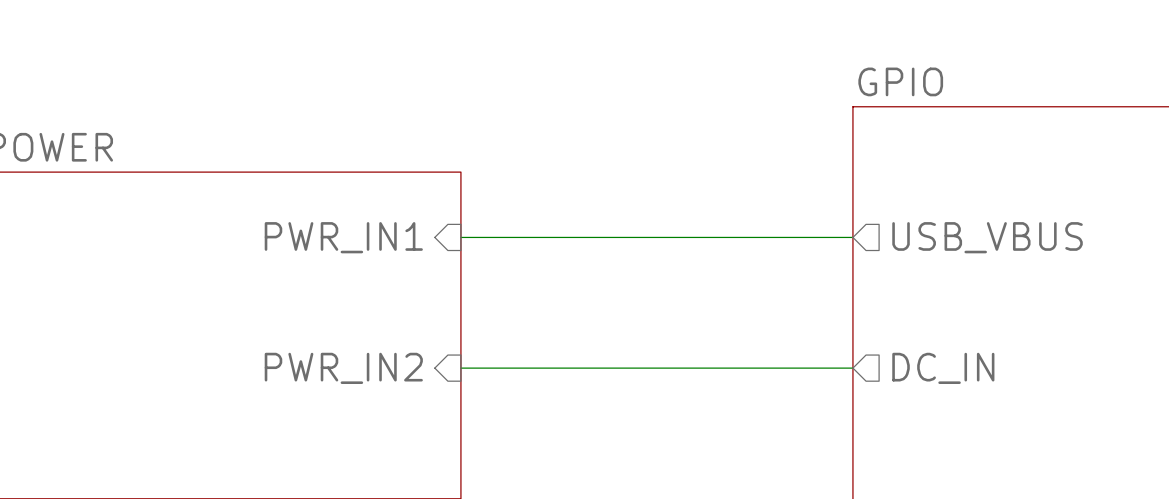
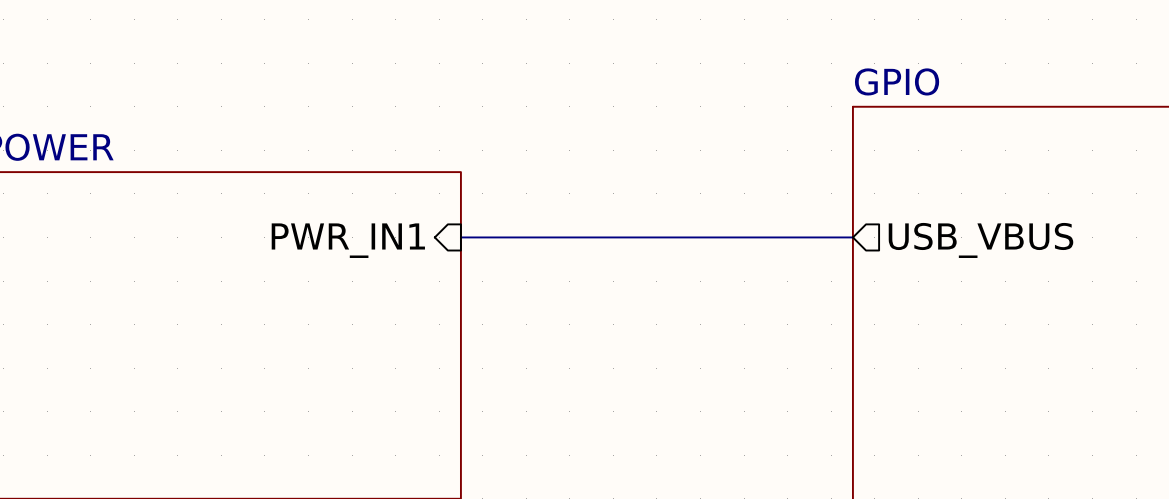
sheet pin: PWR_IN2 (343, 368) -> none
wire: (460, 368) (852, 368) -> none
sheet pin: DC_IN (943, 368) -> none

